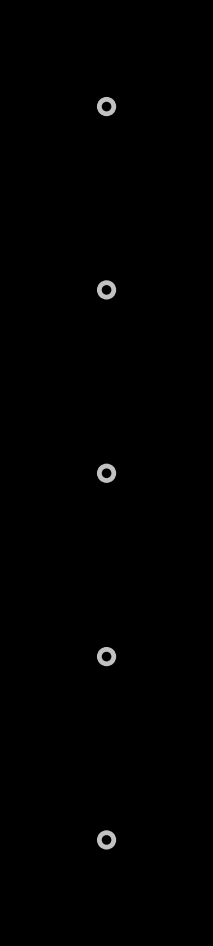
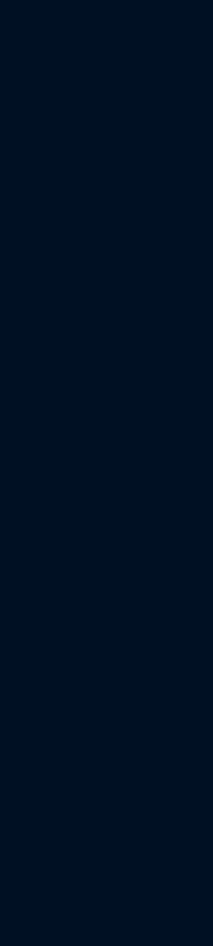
via: (106, 106) -> none
via: (106, 289) -> none
via: (106, 473) -> none
via: (106, 656) -> none
via: (106, 839) -> none

